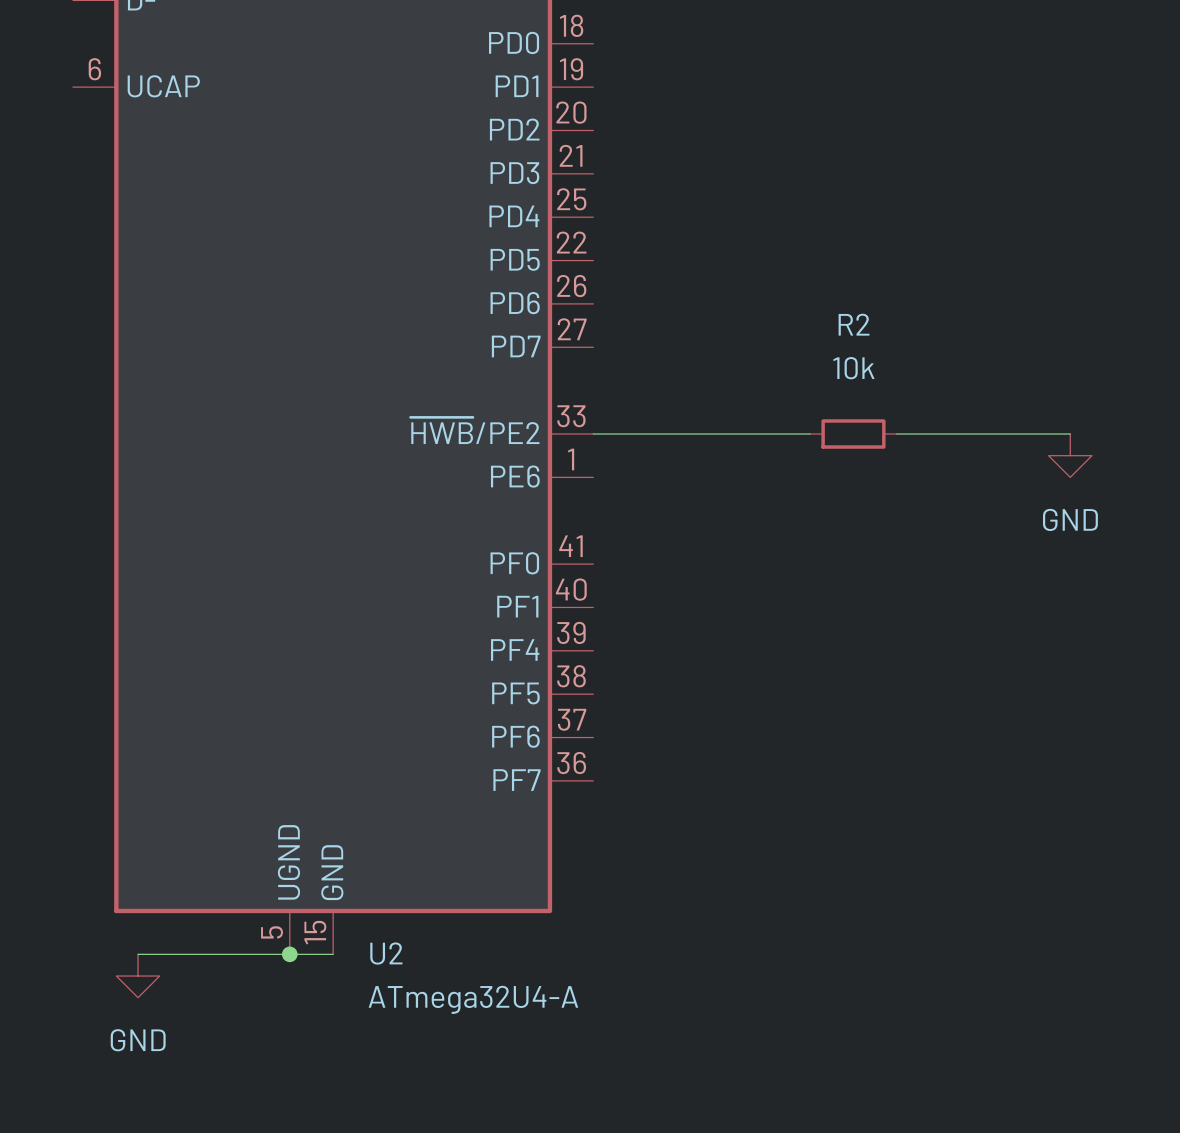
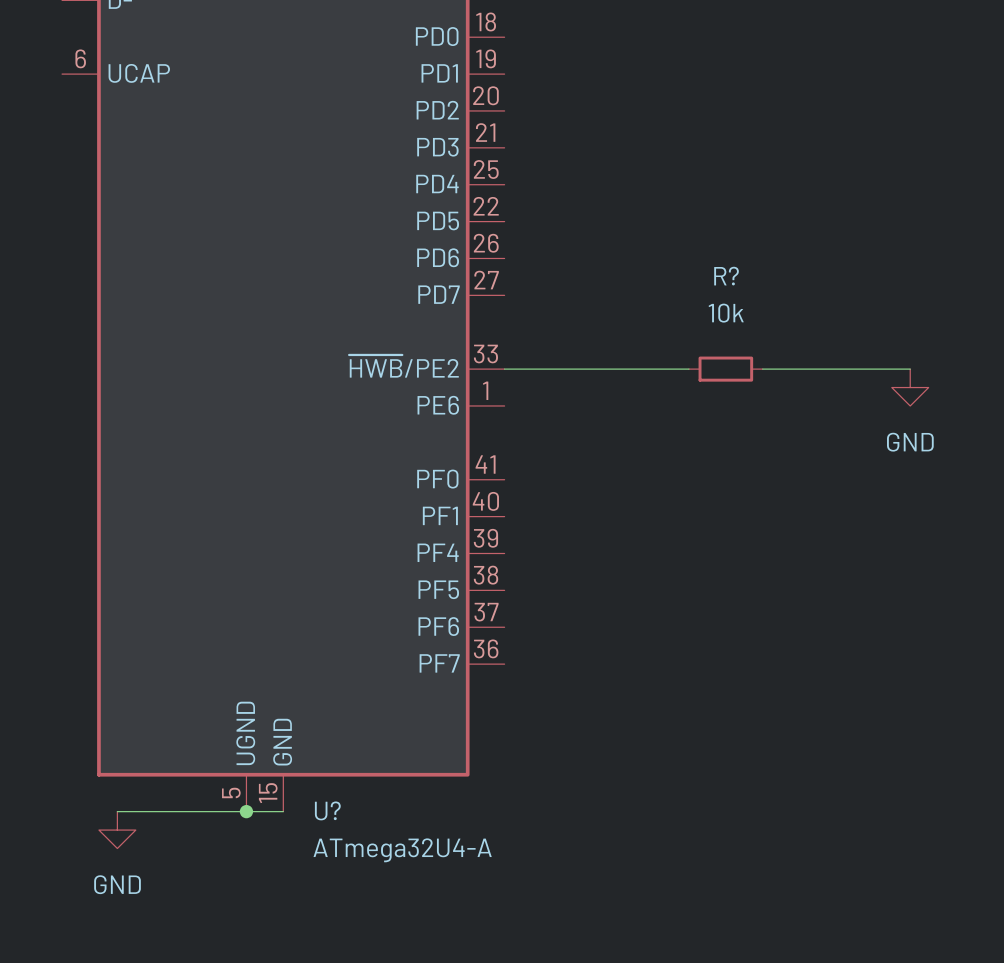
R2 name: R2 (854, 324) -> R? (726, 276)
U2 name: U2 (386, 953) -> U? (327, 810)

